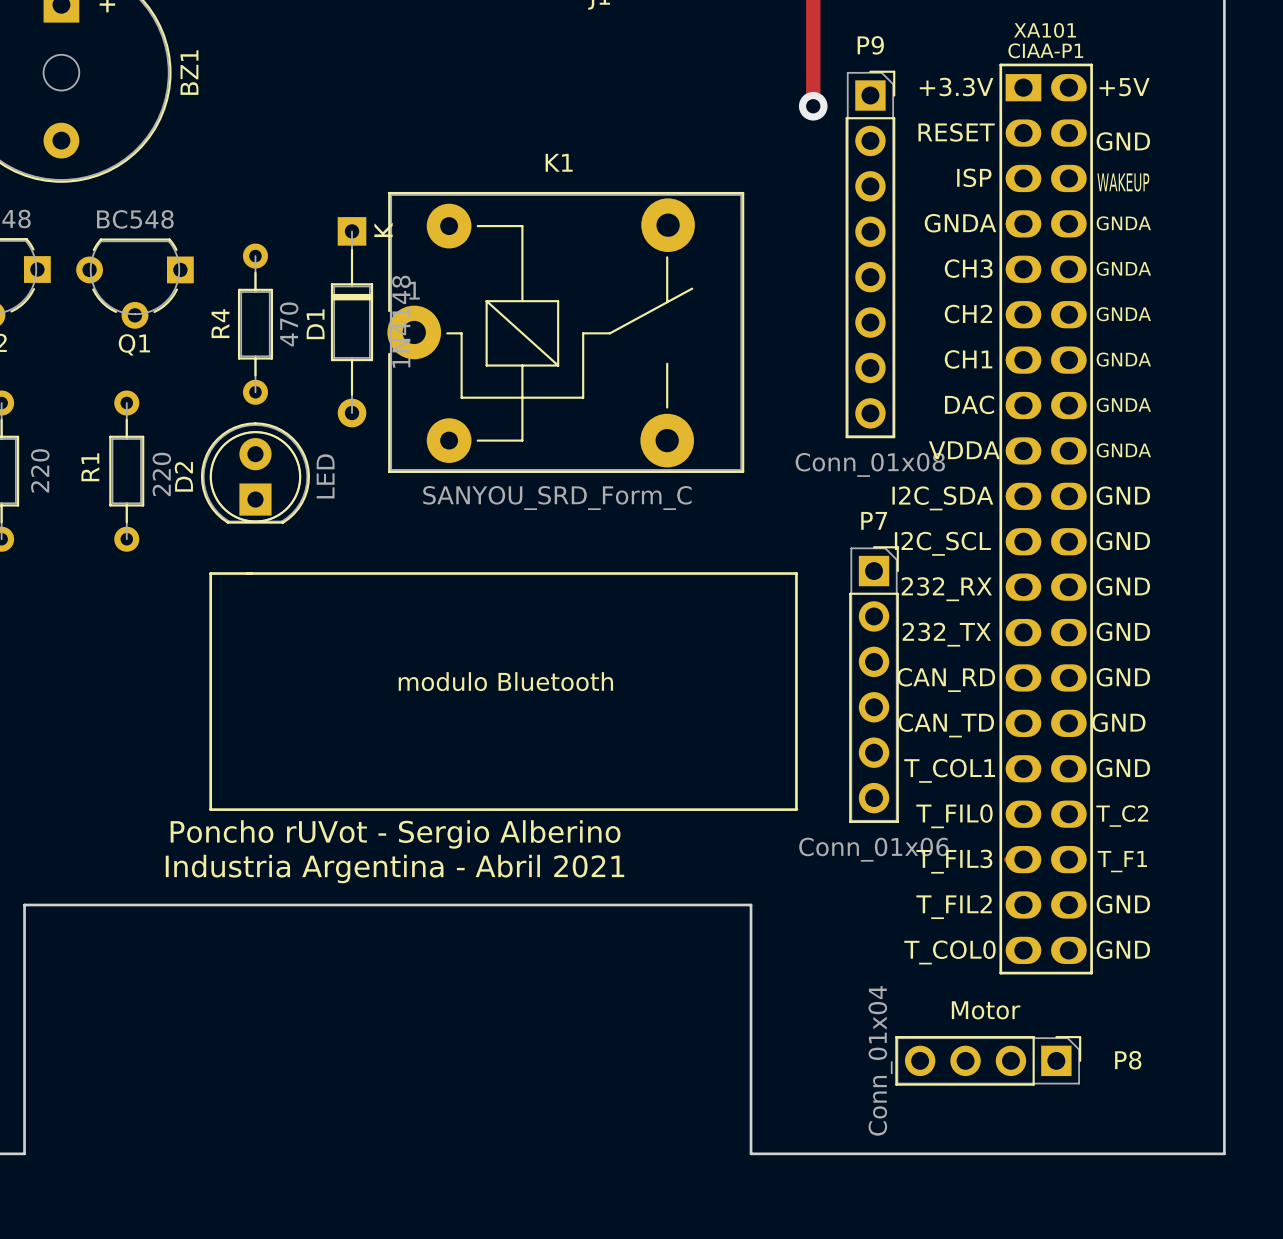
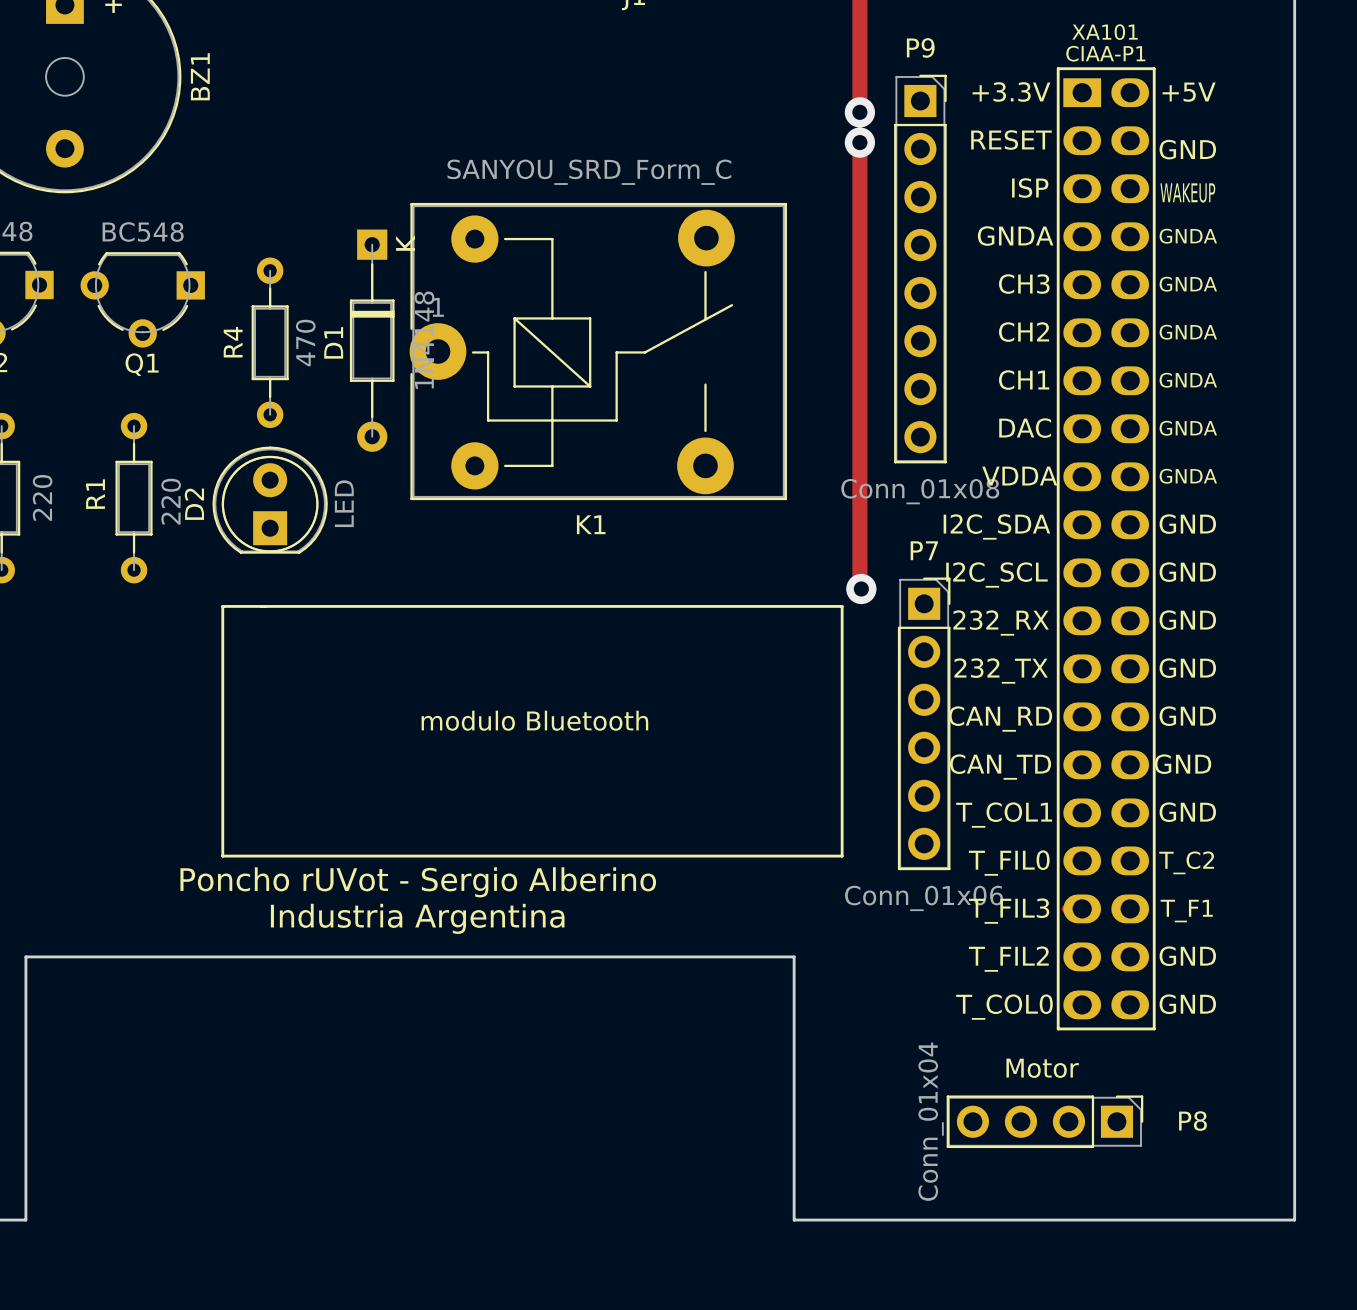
track: none -> (859, 142) (861, 588)
via: none -> (859, 142)
K1 name position: K1 (559, 162) -> K1 (591, 524)
K1 value position: SANYOU_SRD_Form_C (557, 498) -> SANYOU_SRD_Form_C (589, 172)
via: none -> (861, 588)
text: Industria Argentina - Abril 2021 (395, 869) -> Industria Argentina (417, 918)

